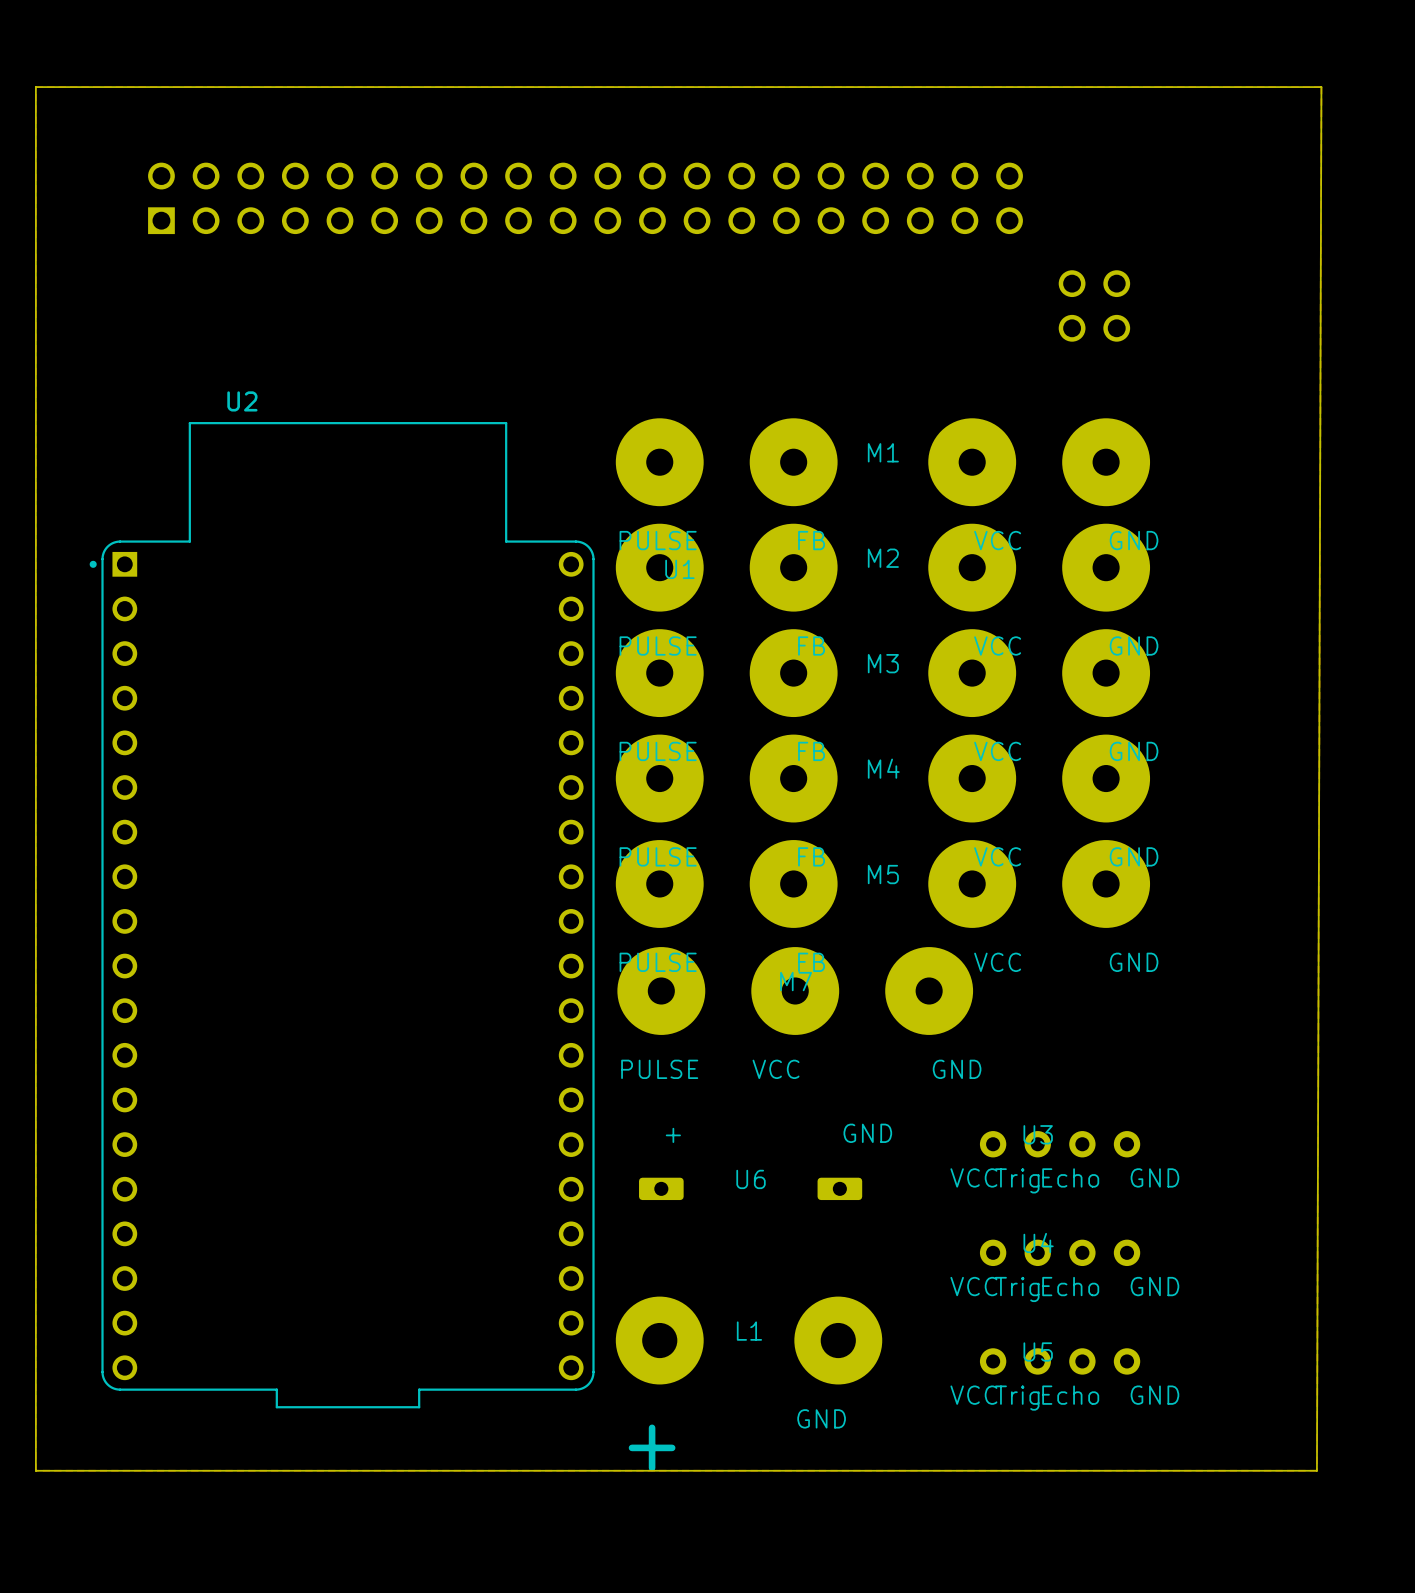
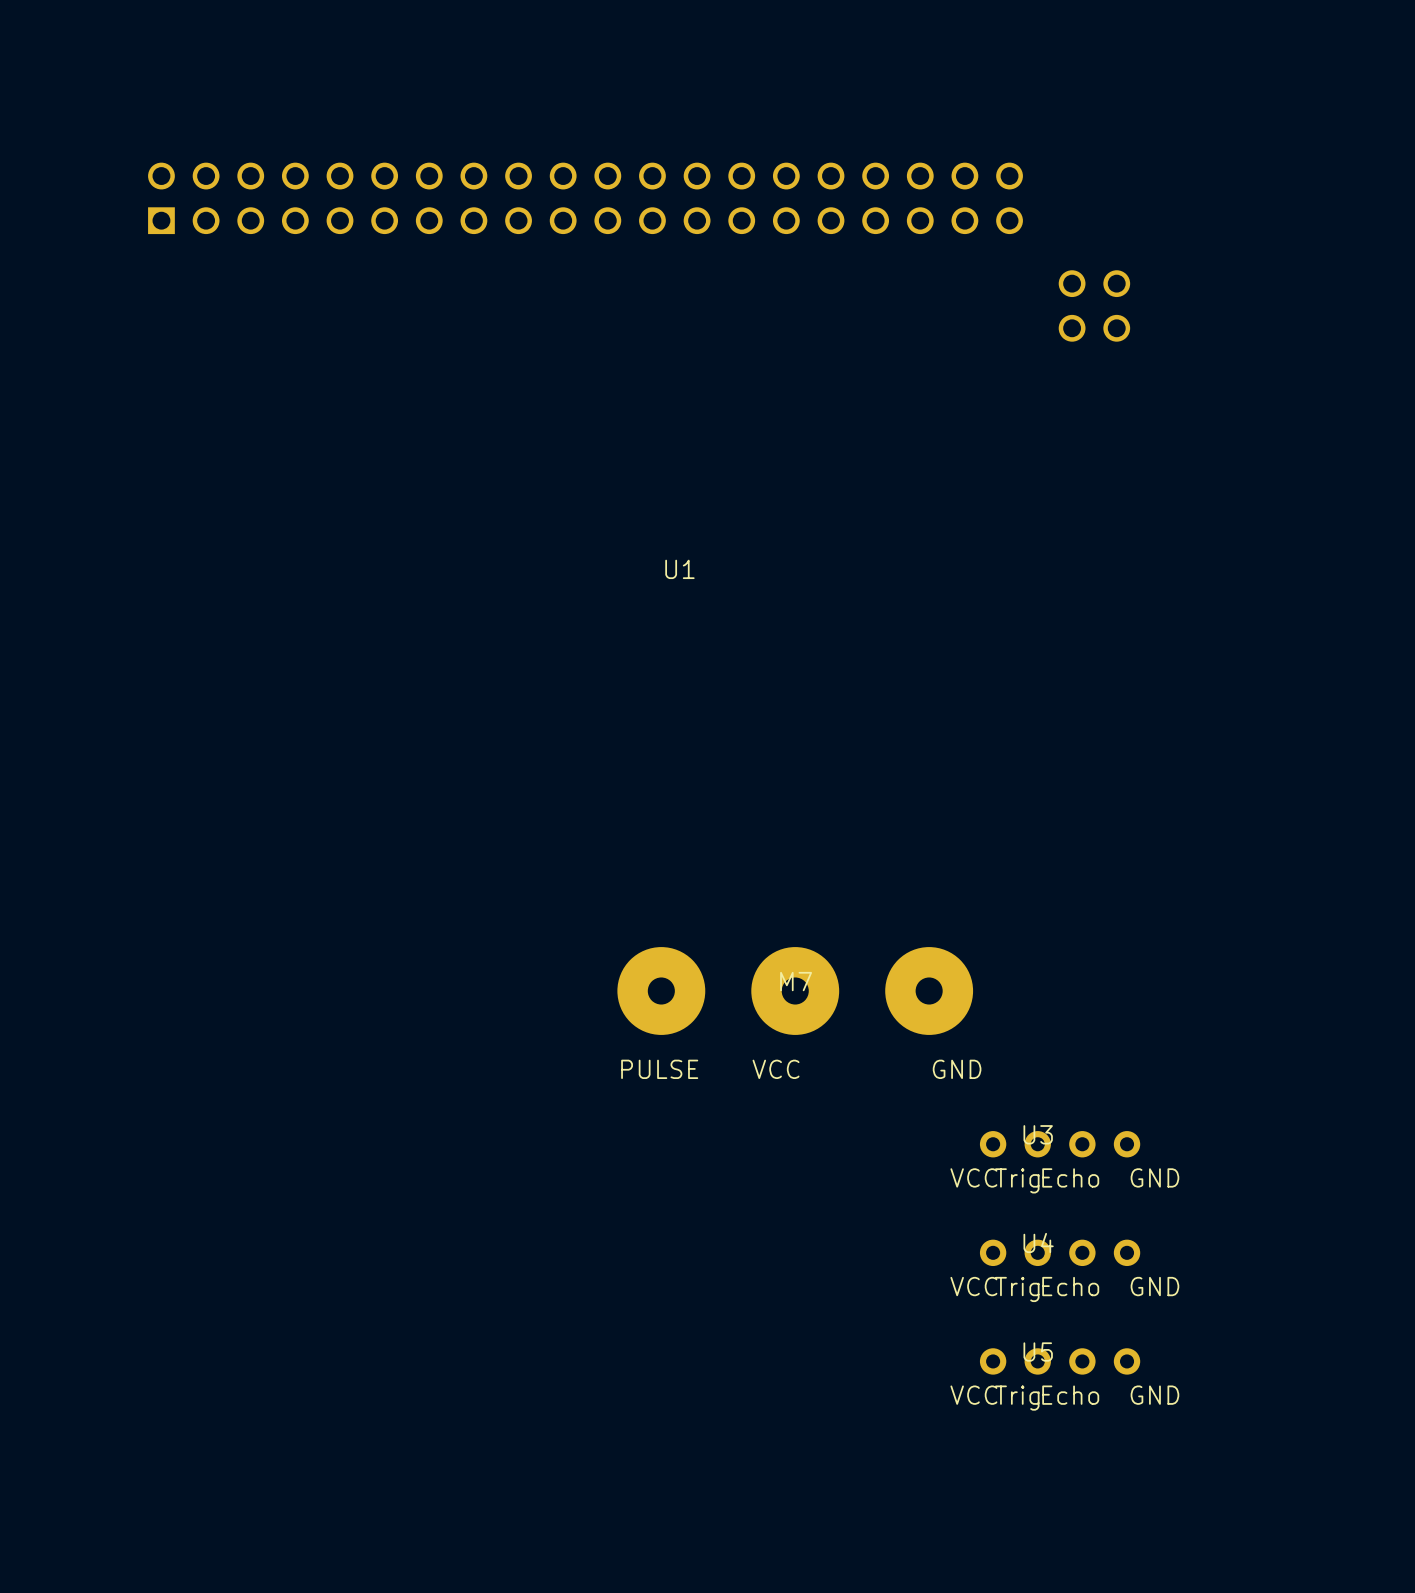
board edge: (35, 87) (35, 1470) (1316, 1470) (1321, 87) (35, 87) -> none
M1: (882, 462) -> none
M2: (882, 567) -> none
M3: (882, 673) -> none
M4: (882, 778) -> none
M5: (882, 883) -> none
U2: (342, 915) -> none
U6: (750, 1188) -> none
L1: (749, 1340) -> none

